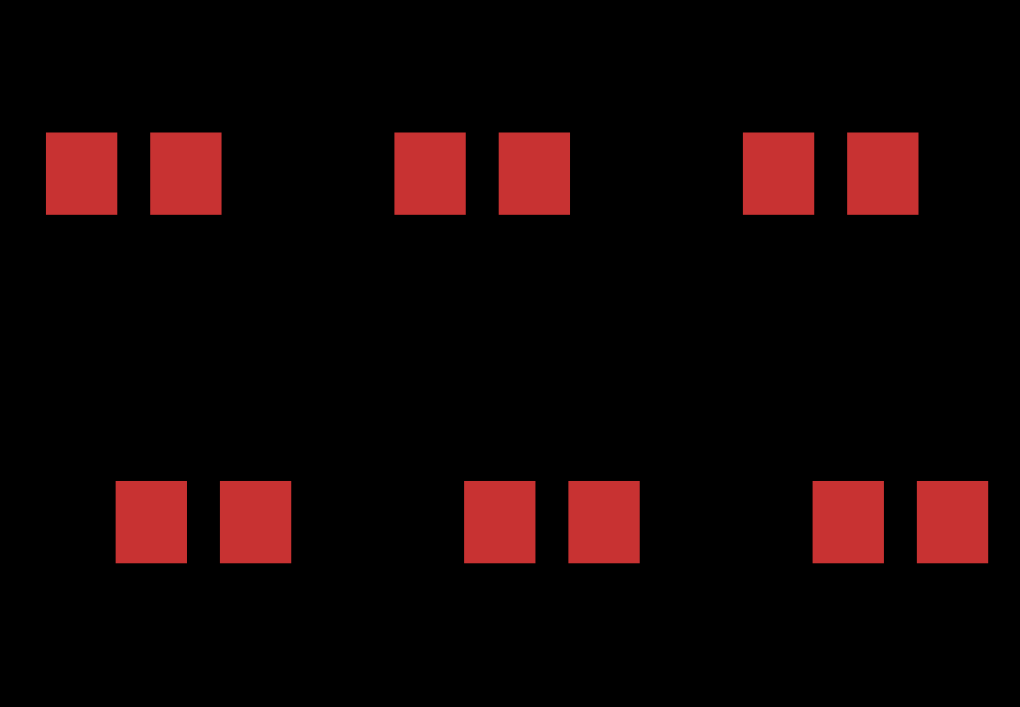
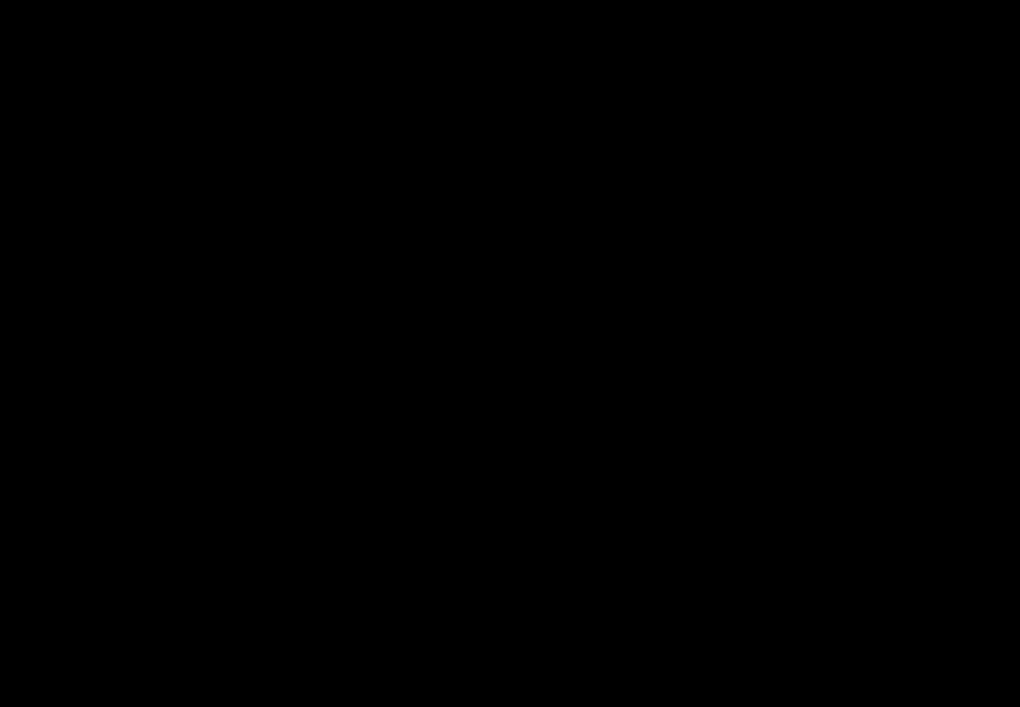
part: (133, 173) -> none
part: (482, 173) -> none
part: (830, 173) -> none
part: (203, 522) -> none
part: (551, 522) -> none
part: (900, 522) -> none

